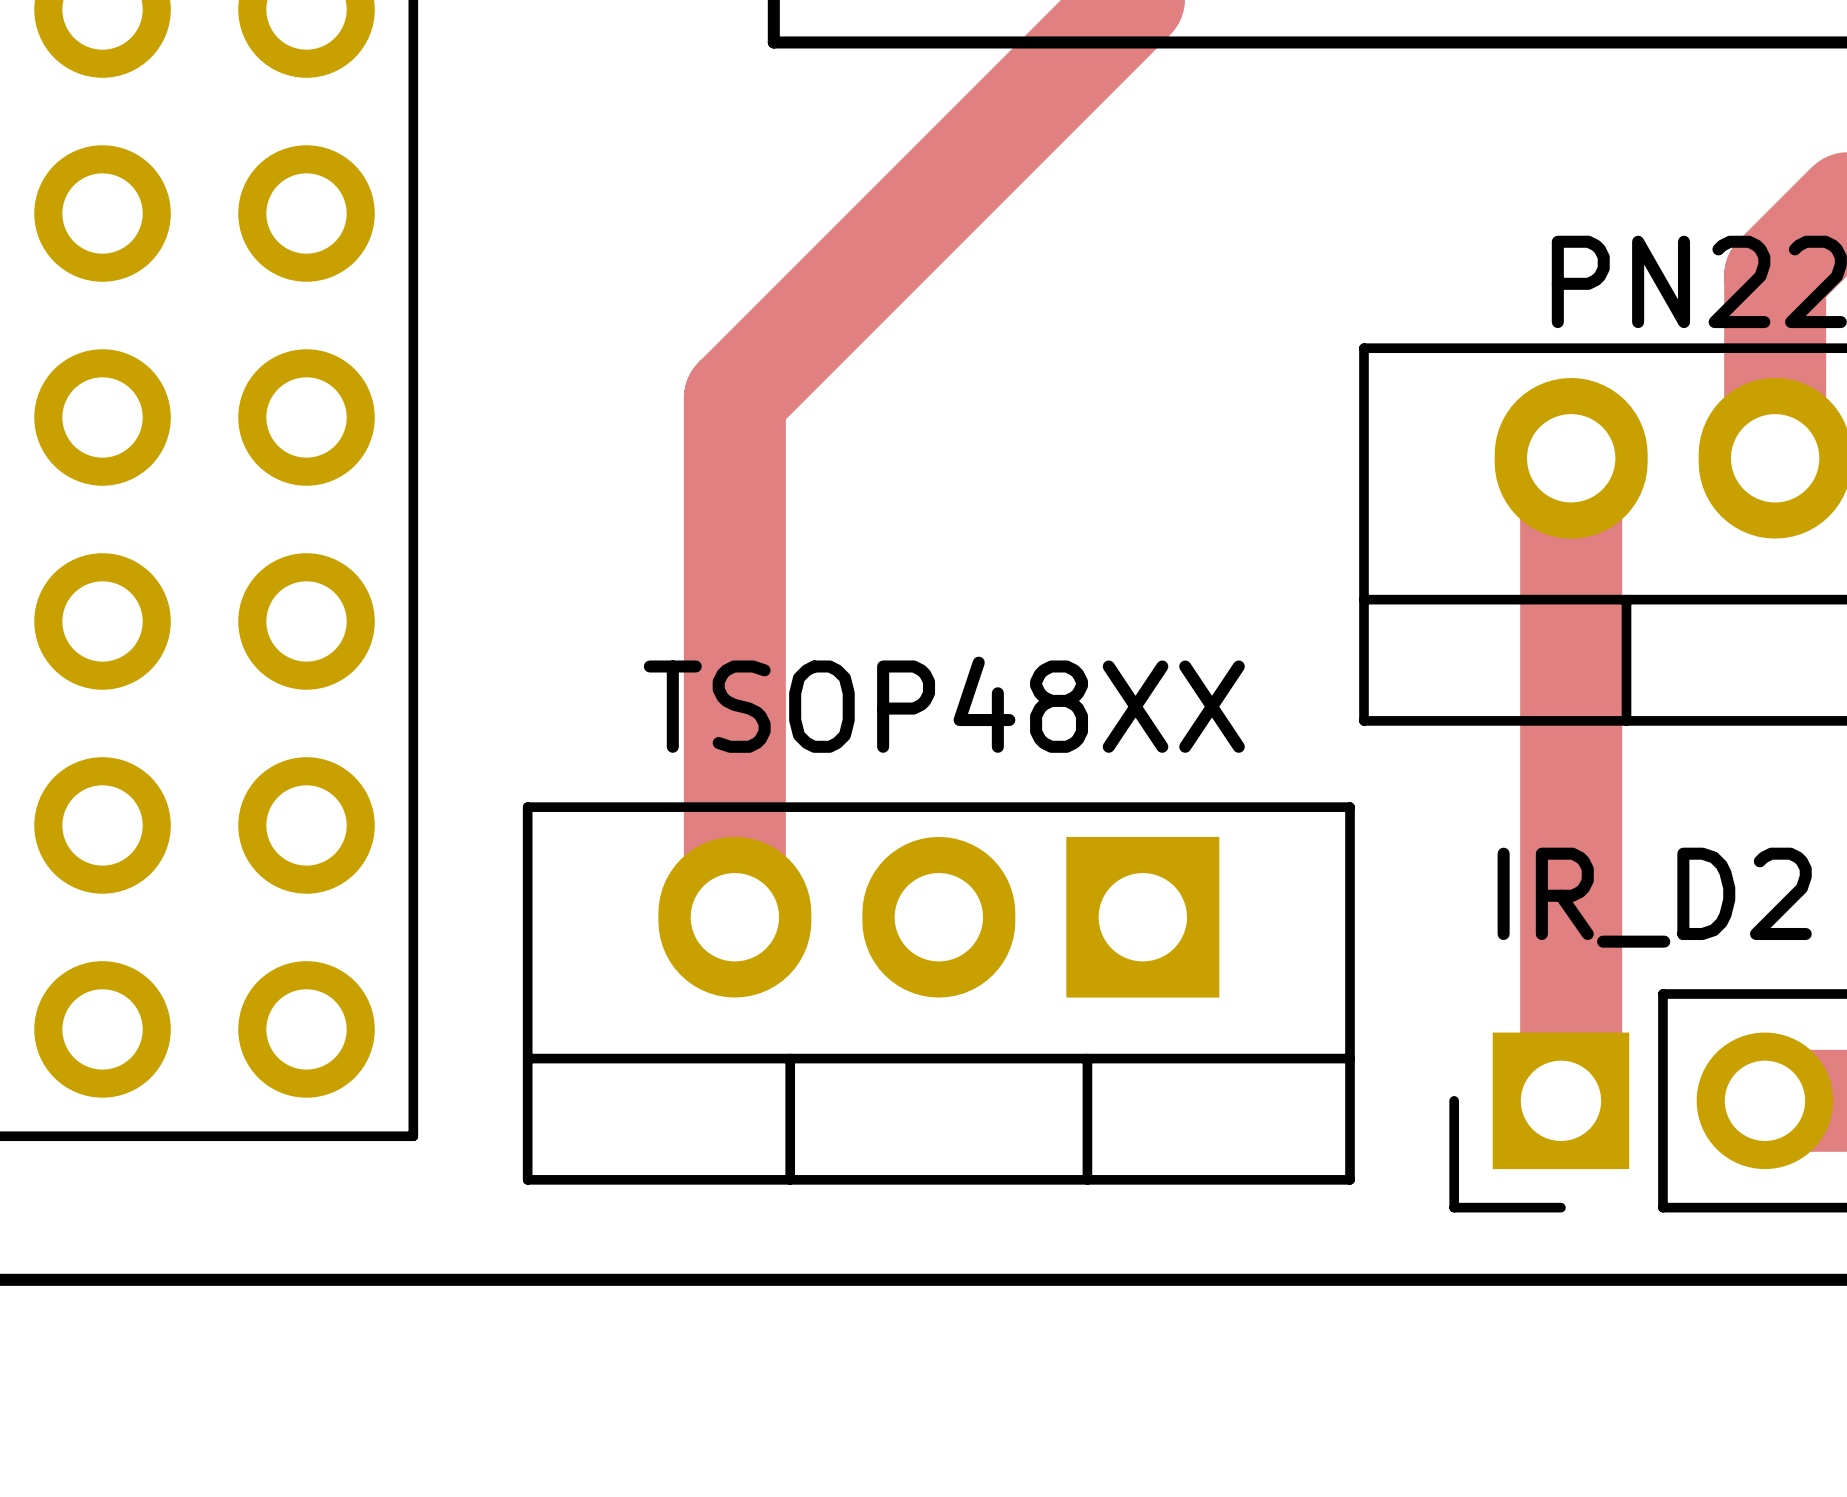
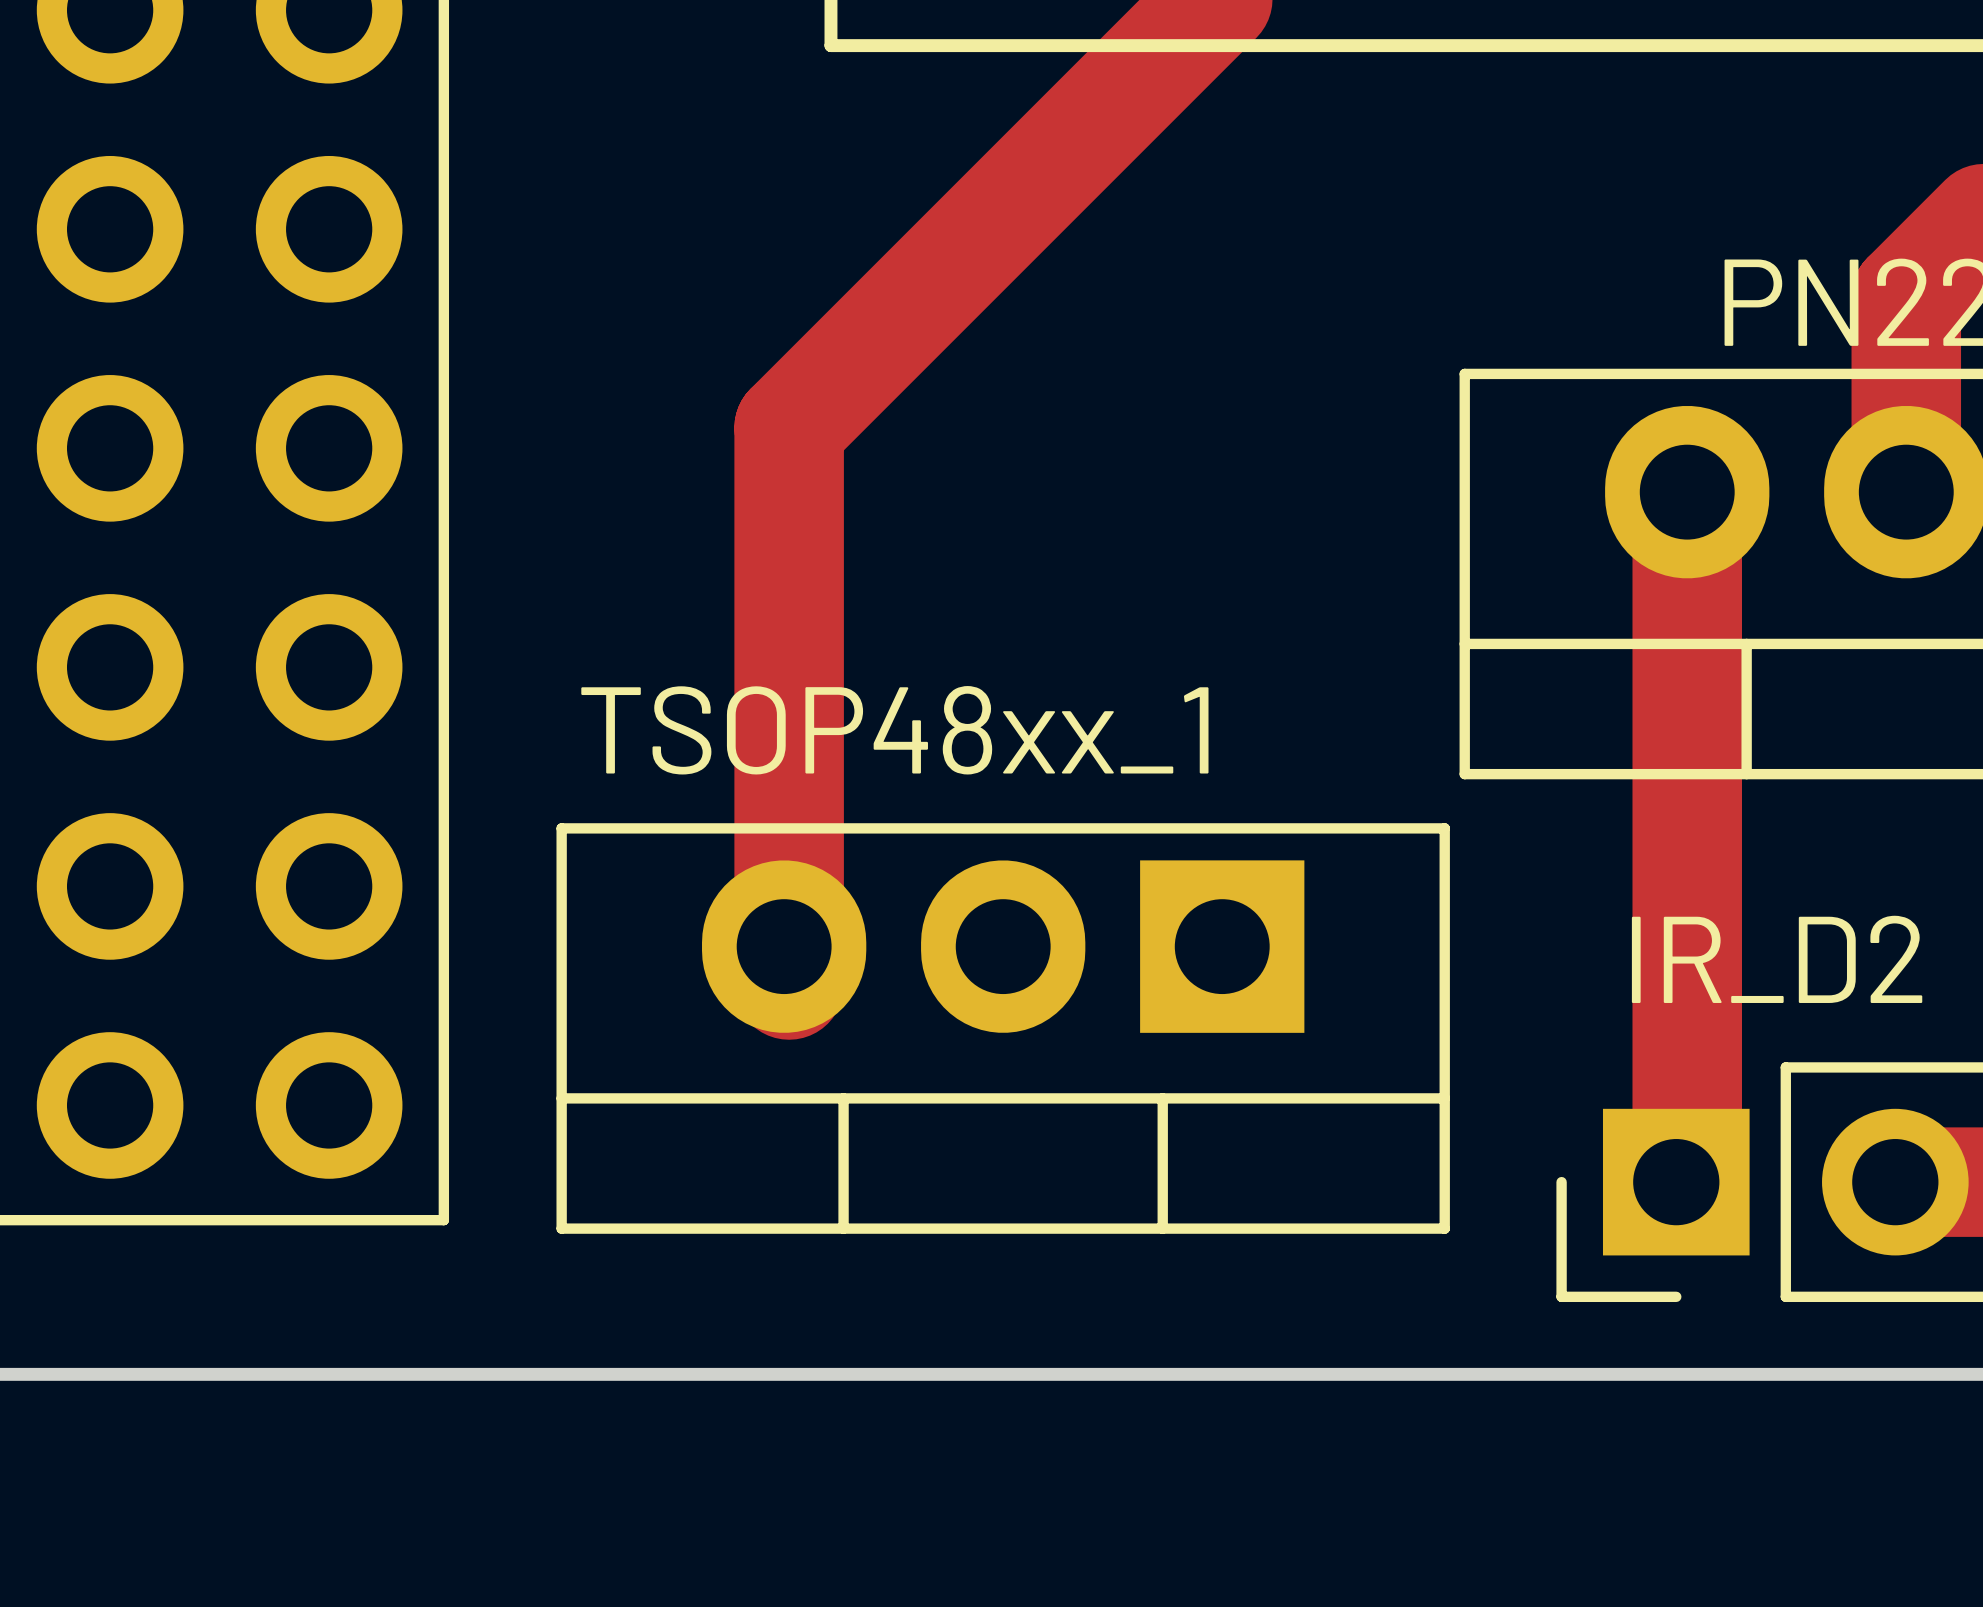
TSOP48XX name: TSOP48XX (944, 704) -> TSOP48xx_1 (894, 730)
TSOP48XX position: (938, 993) -> (1003, 1028)

